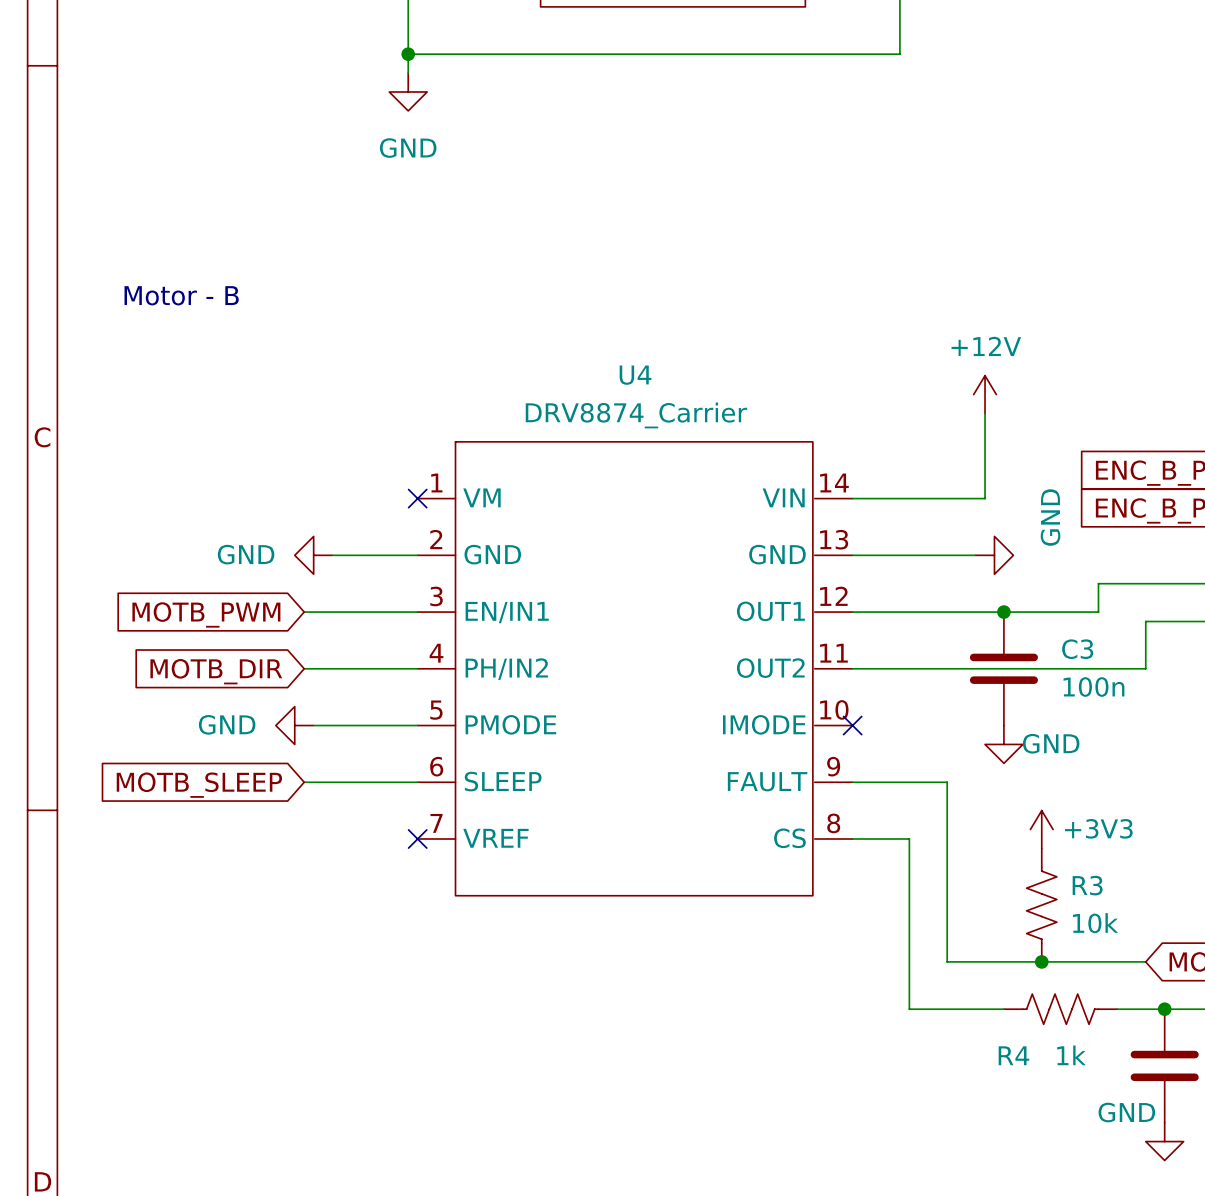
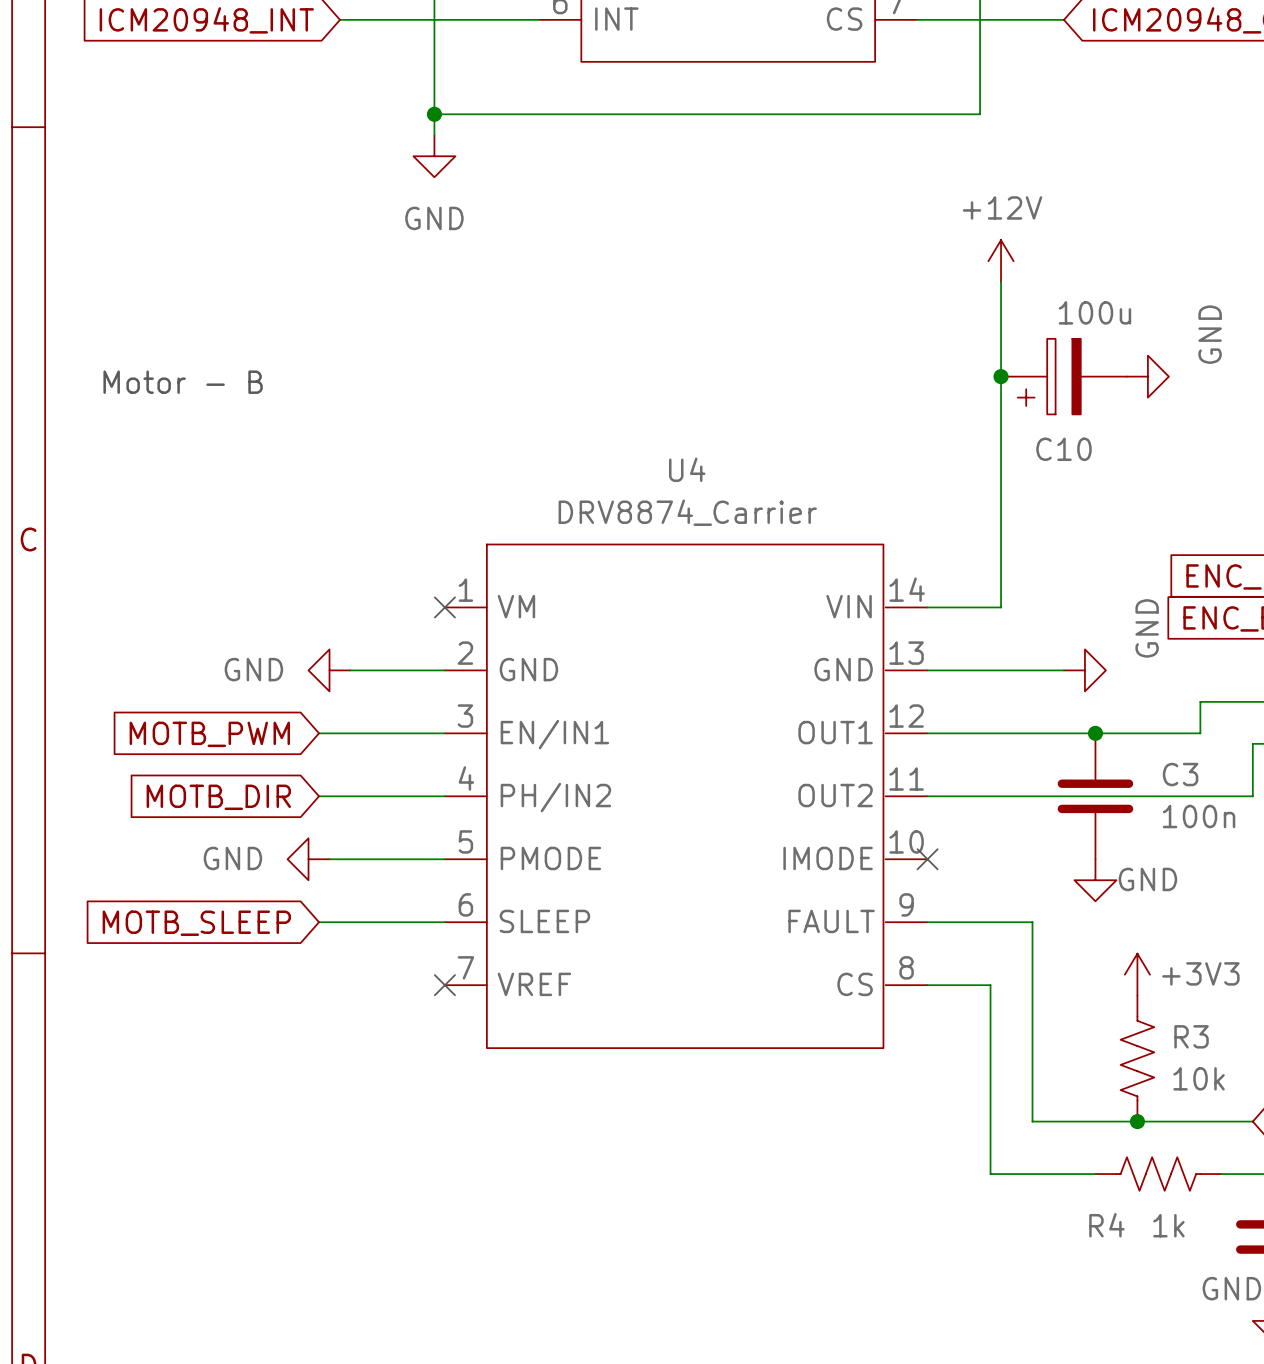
junction: none -> (1001, 376)
C10: none -> 100u (1063, 376)
power symbol: none -> GND (1147, 376)
power symbol position: +12V (985, 394) -> +12V (1001, 261)
wire: (985, 413) (985, 498) (918, 498) -> (1001, 282) (1001, 607)

